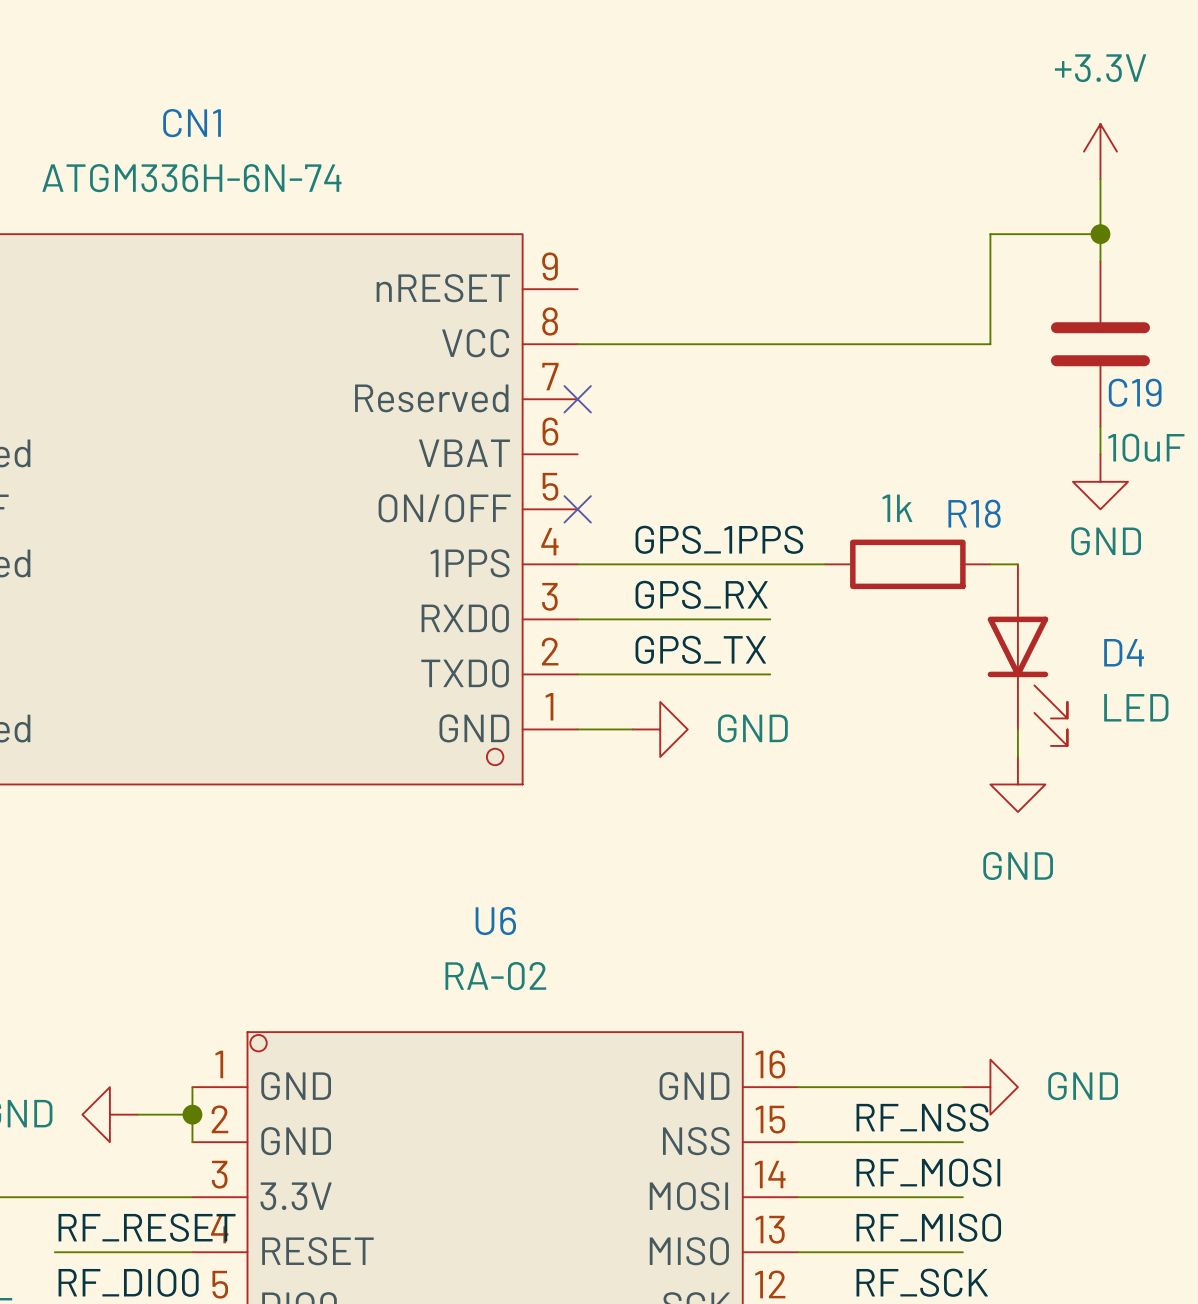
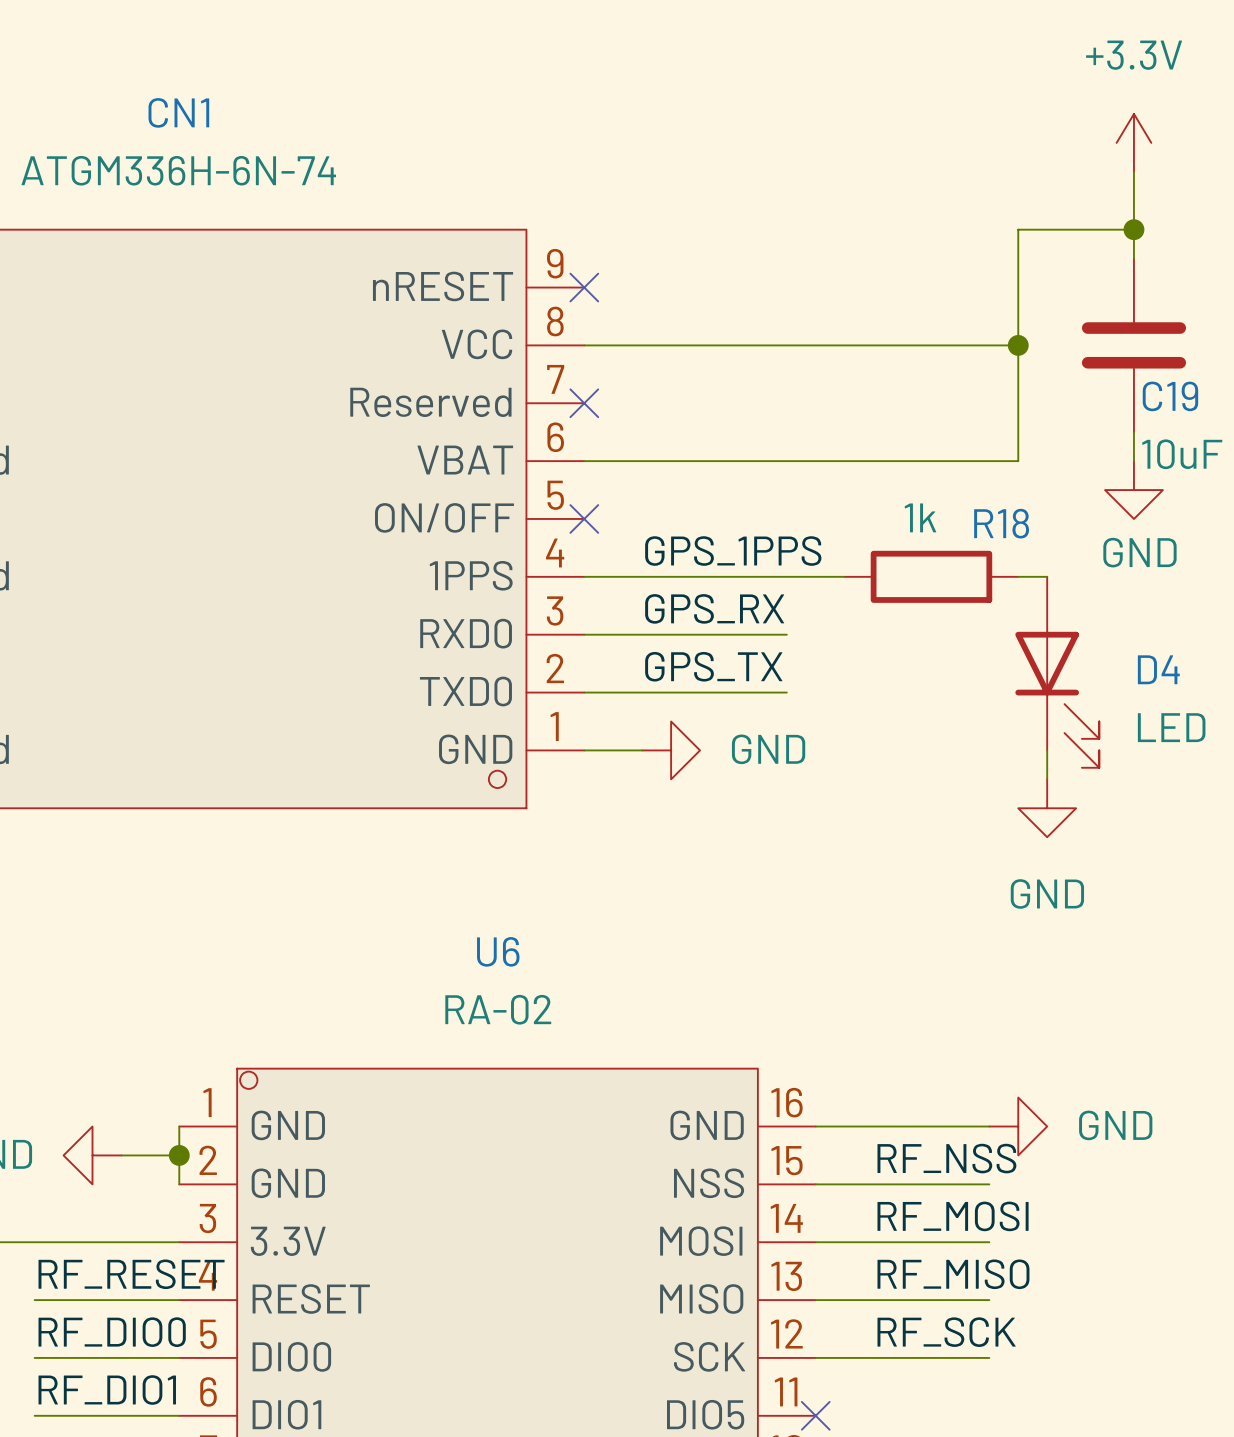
no-connect mark: none -> (584, 287)
wire: none -> (1018, 345) (1018, 461) (584, 461)
junction: none -> (1018, 345)

